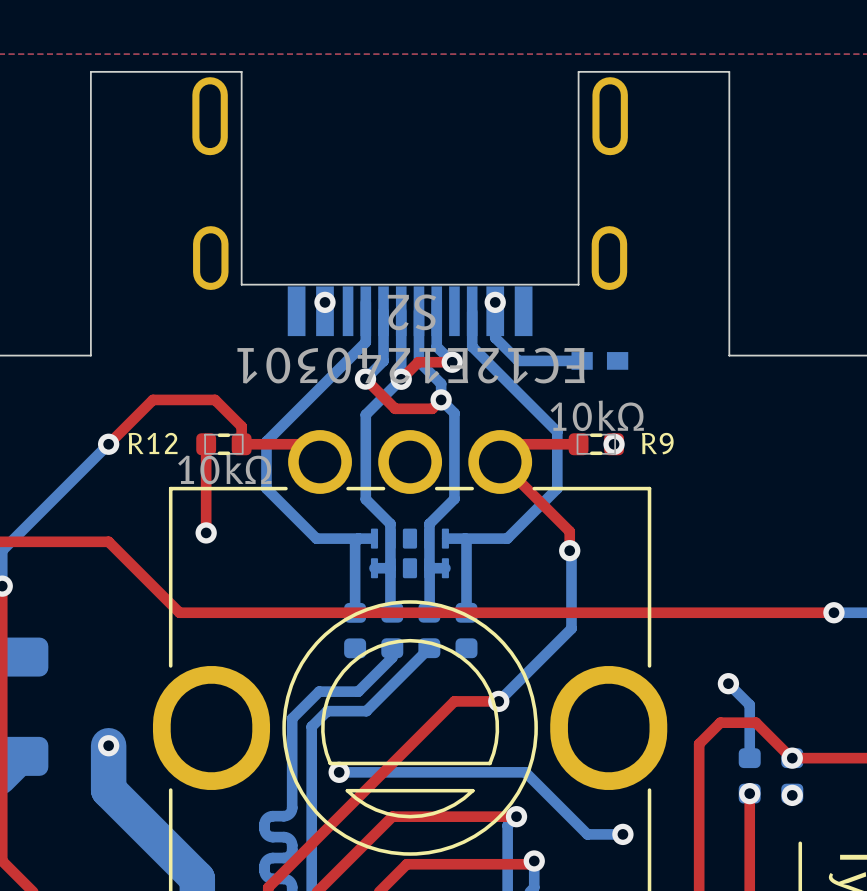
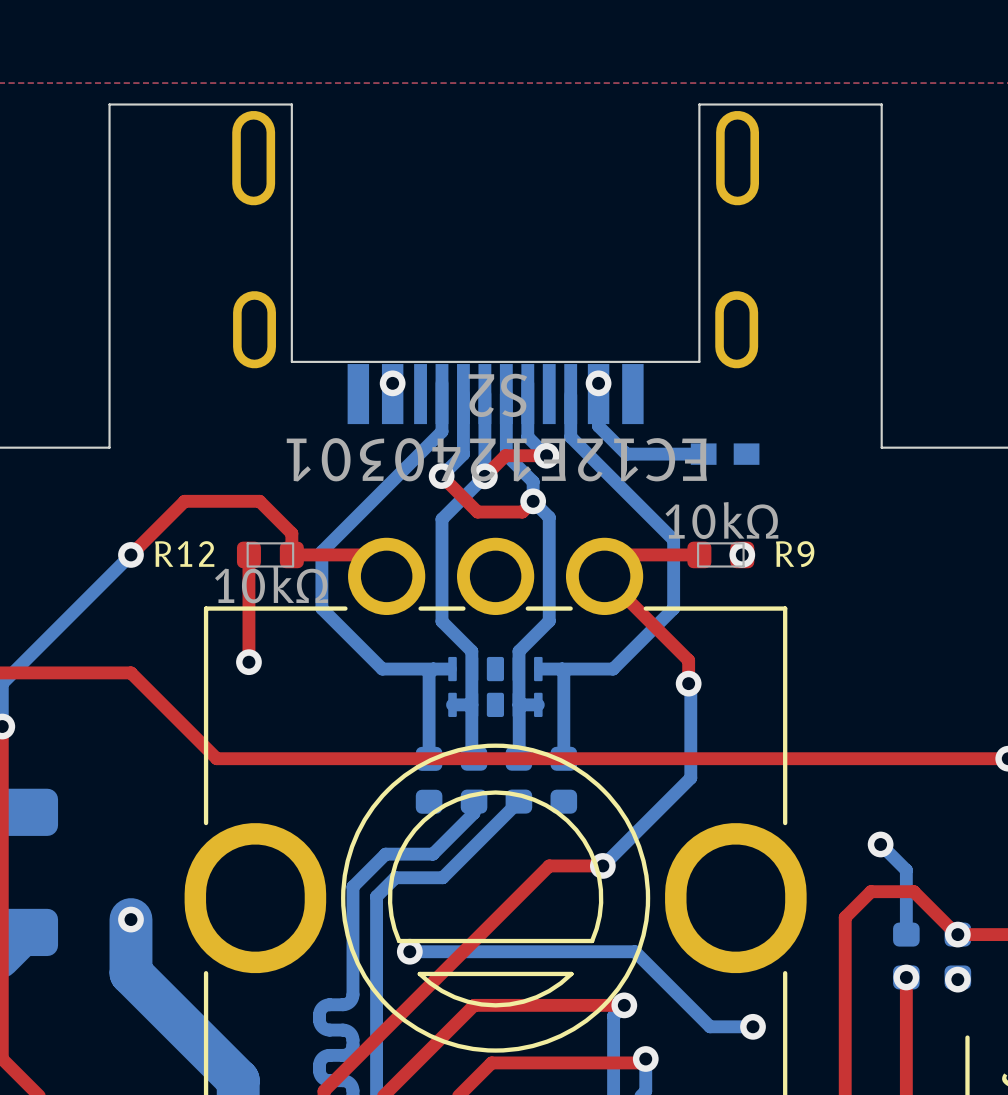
R12 footprint: [196, 433, 252, 456] -> [236, 541, 304, 569]
R9 footprint: [568, 433, 624, 456] -> [687, 541, 755, 569]

